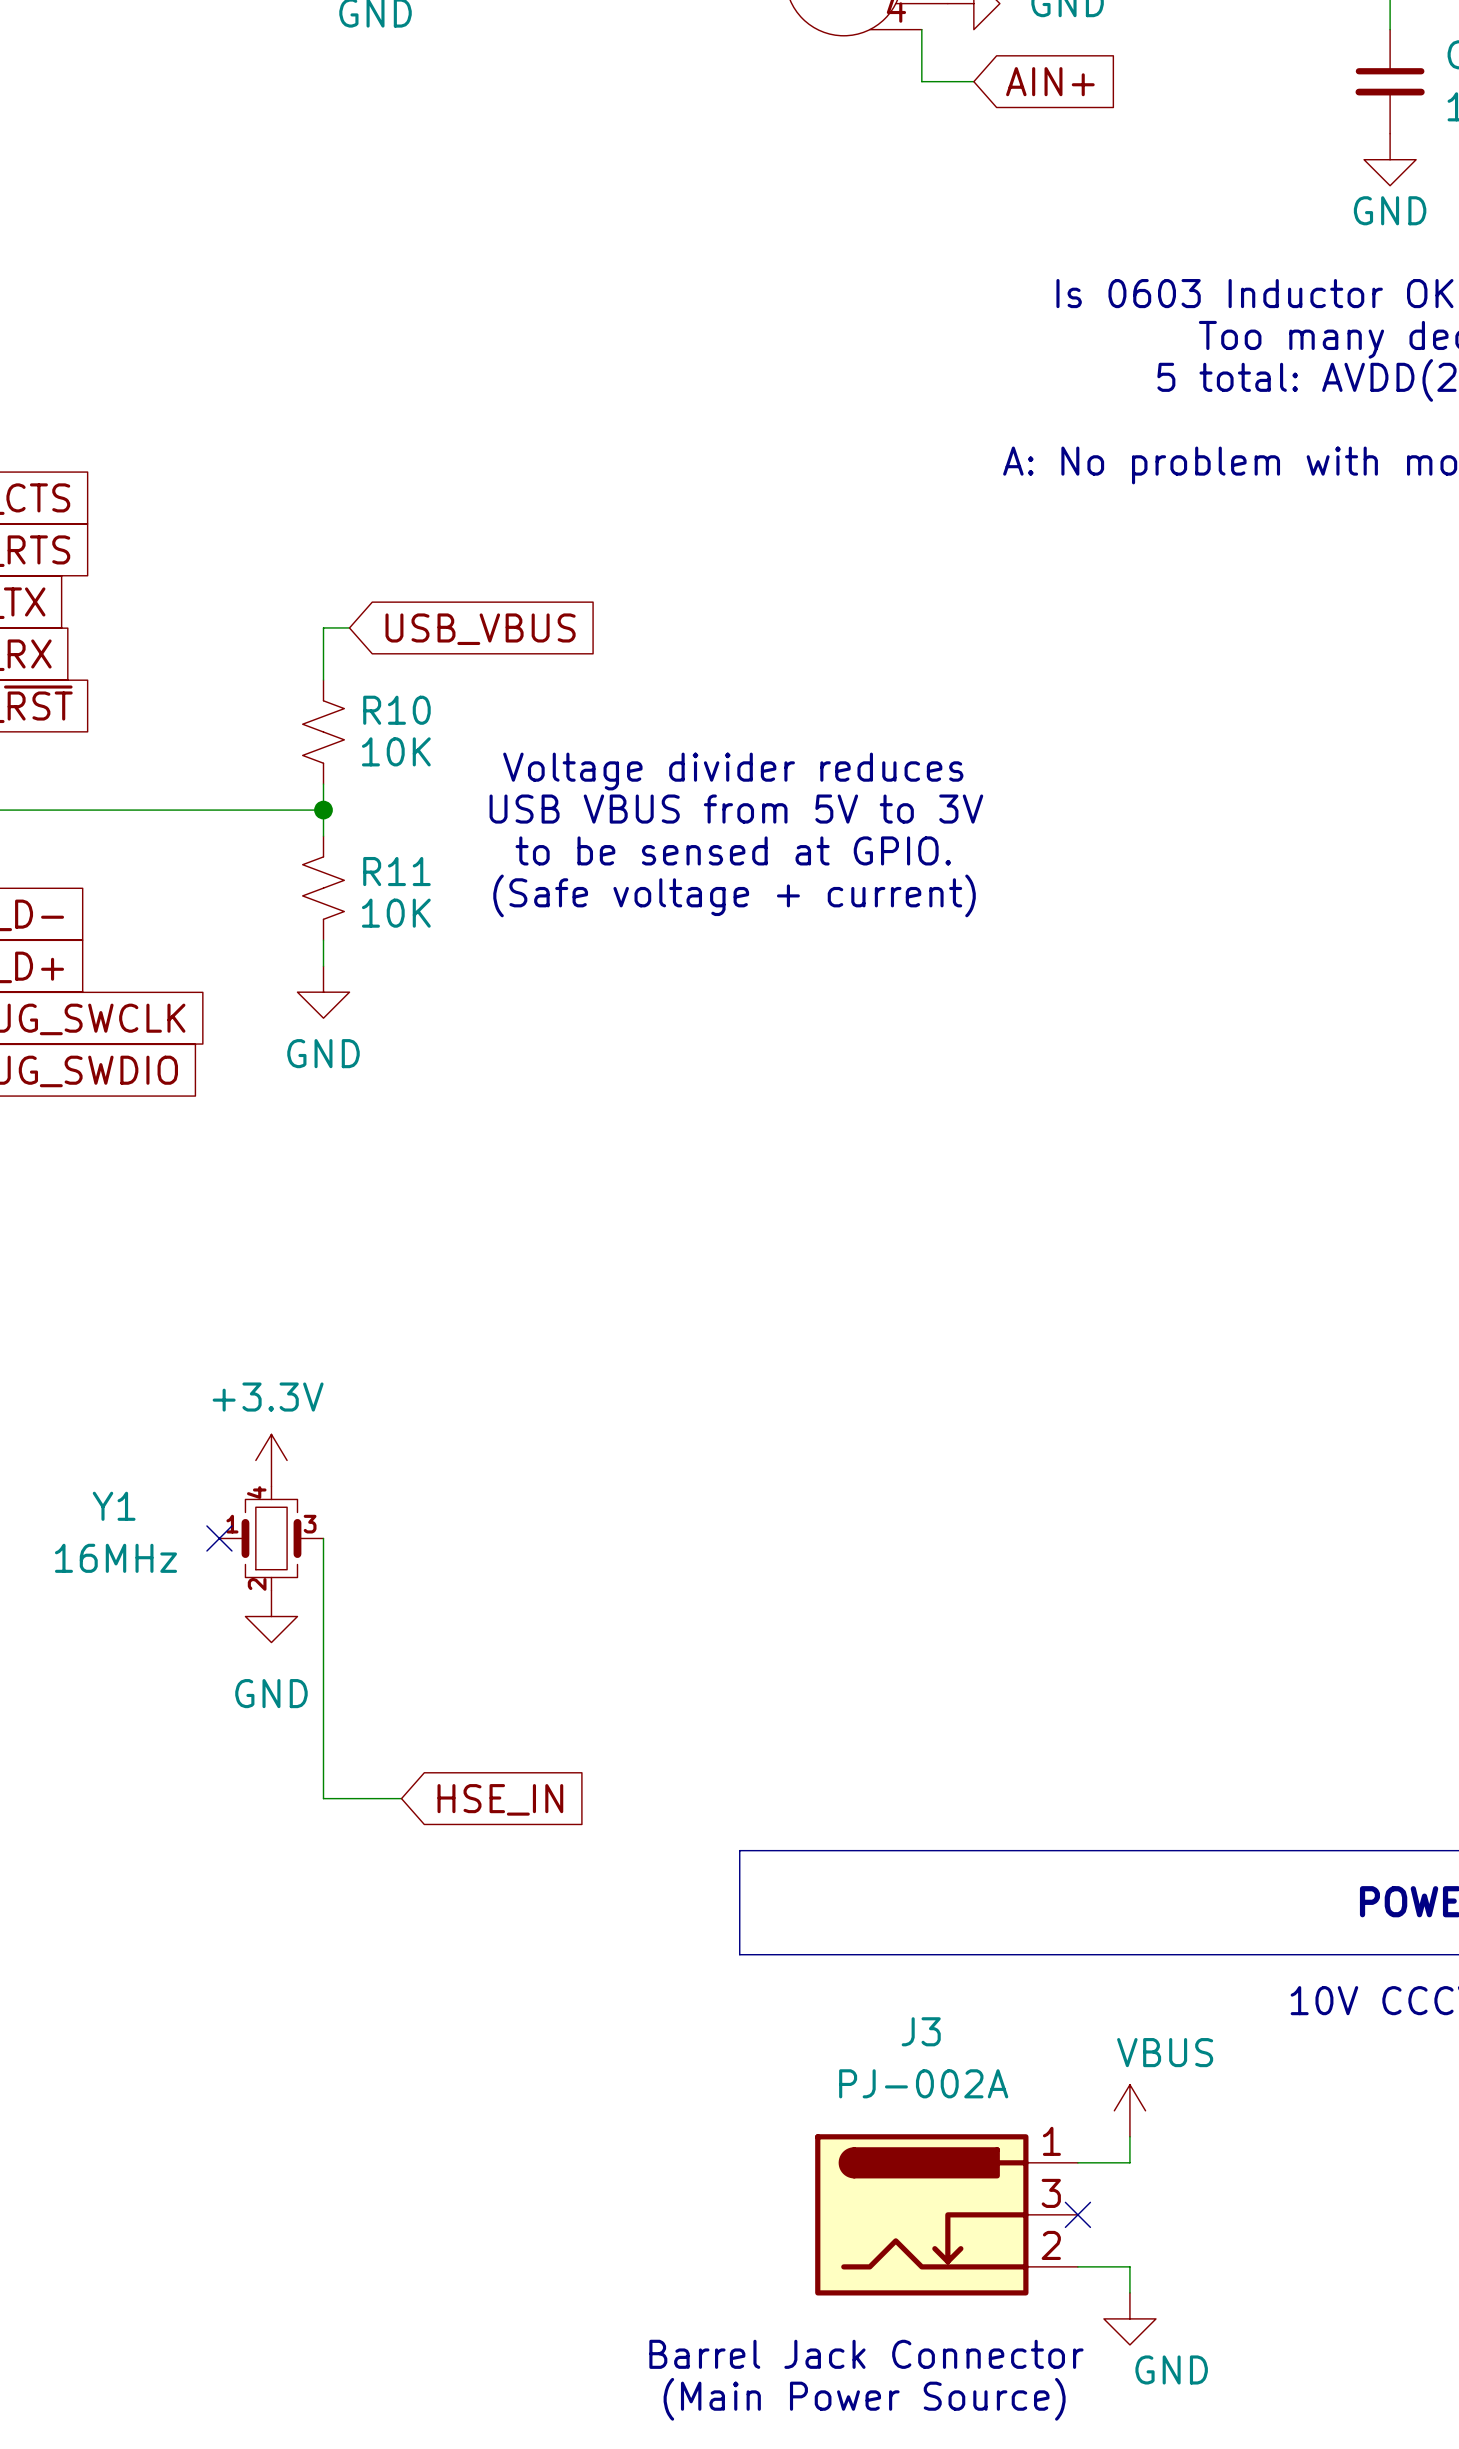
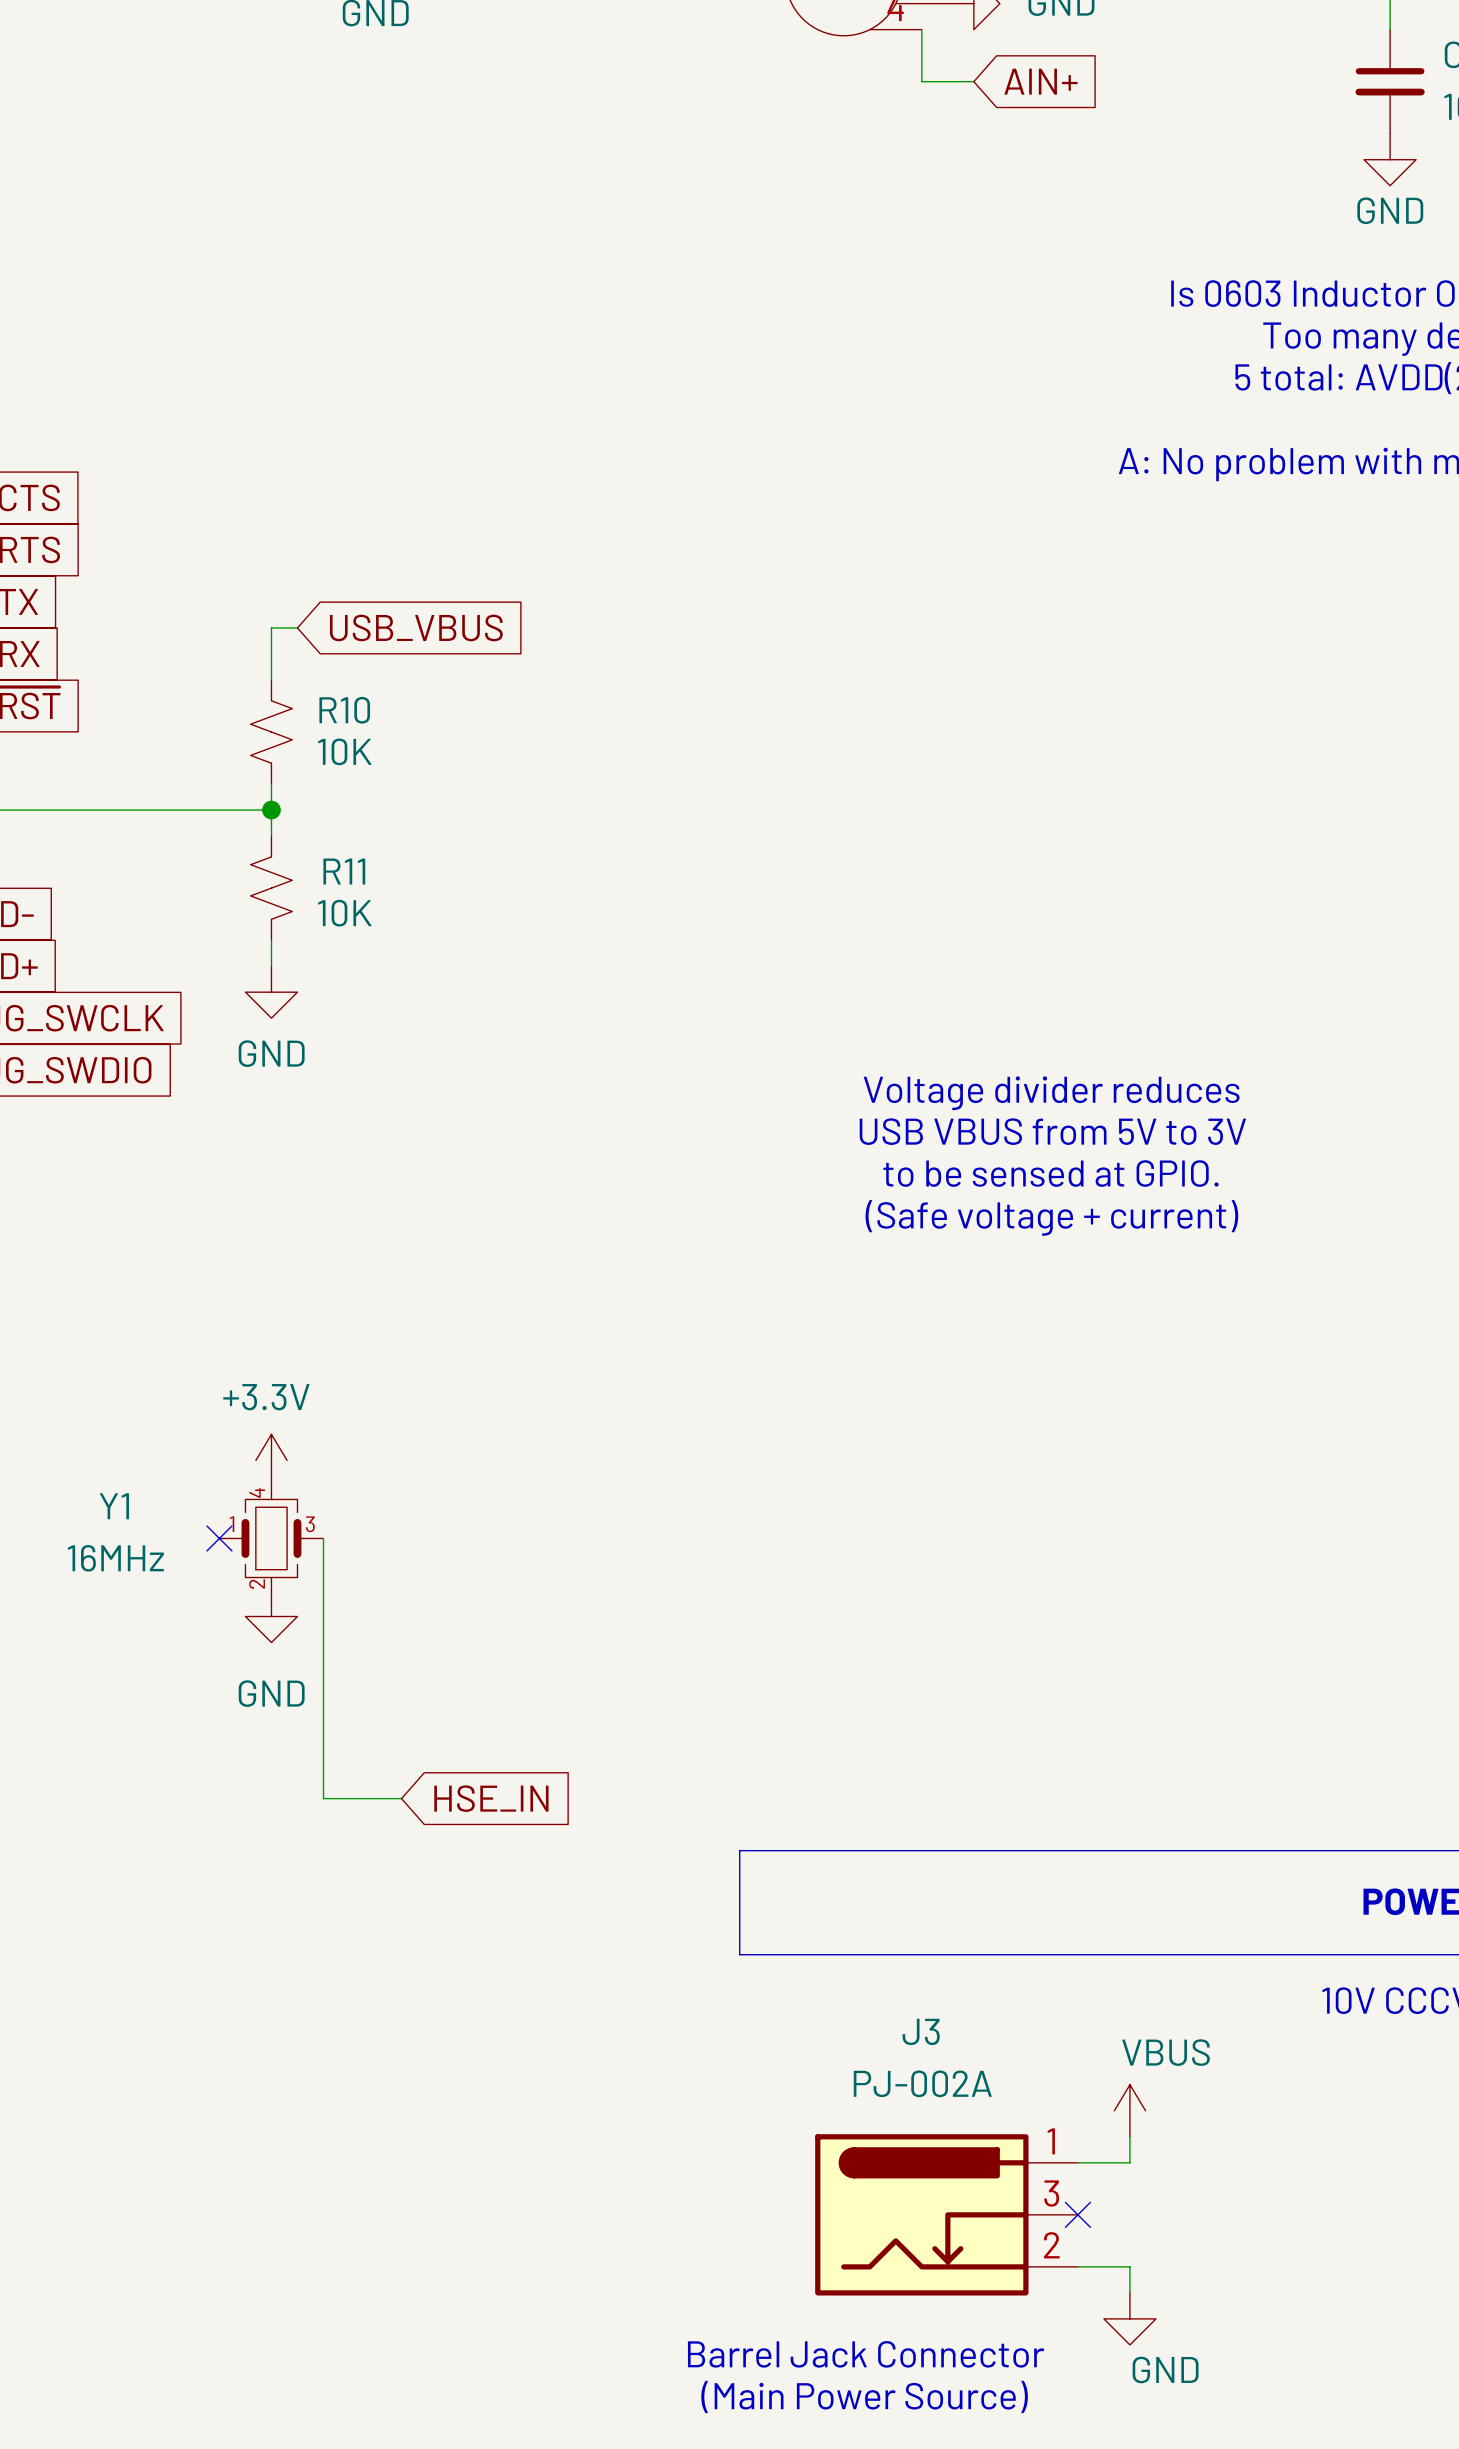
wire: (349, 627) (323, 627) (323, 680) -> (297, 627) (271, 627) (271, 680)
global label position: USB_VBUS (480, 629) -> USB_VBUS (416, 627)
R10 position: (323, 732) -> (271, 732)
text position: Voltage divider reduces (733, 771) -> Voltage divider reduces (1051, 1093)
wire: (323, 784) (323, 836) -> (271, 784) (271, 836)
text position: USB VBUS from 5V to 3V (736, 809) -> USB VBUS from 5V to 3V (1052, 1131)
wire: (271, 810) (323, 810) -> none
junction position: (323, 810) -> (271, 810)
text position: to be sensed at GPIO. (733, 850) -> to be sensed at GPIO. (1051, 1173)
R11 position: (323, 888) -> (271, 888)
text position: (Safe voltage + current) (734, 895) -> (Safe voltage + current) (1051, 1217)
wire: (323, 940) (323, 966) -> (271, 940) (271, 966)
power symbol position: GND (323, 992) -> GND (271, 992)

